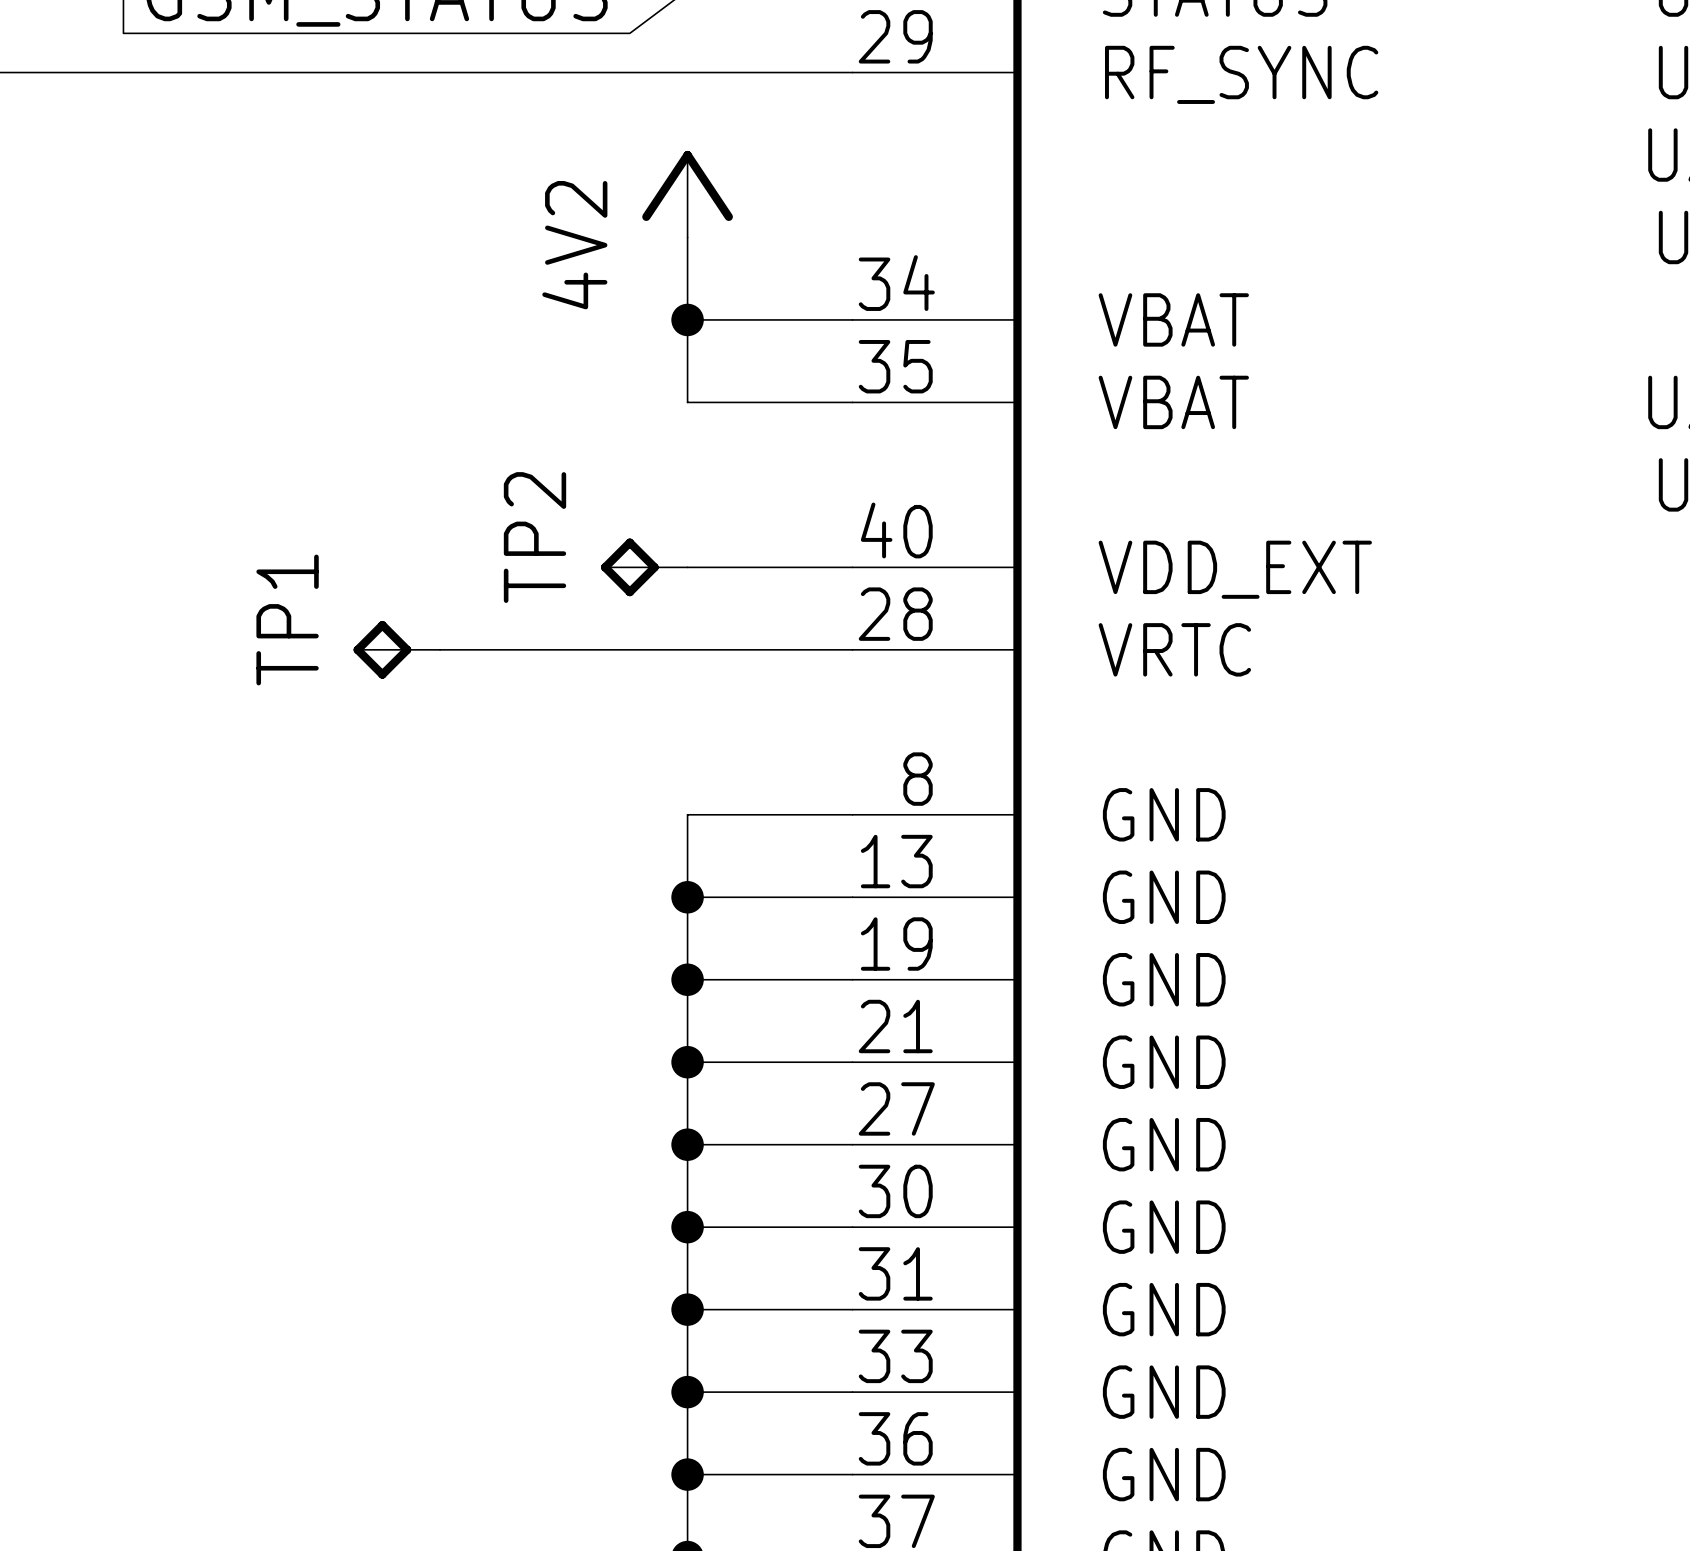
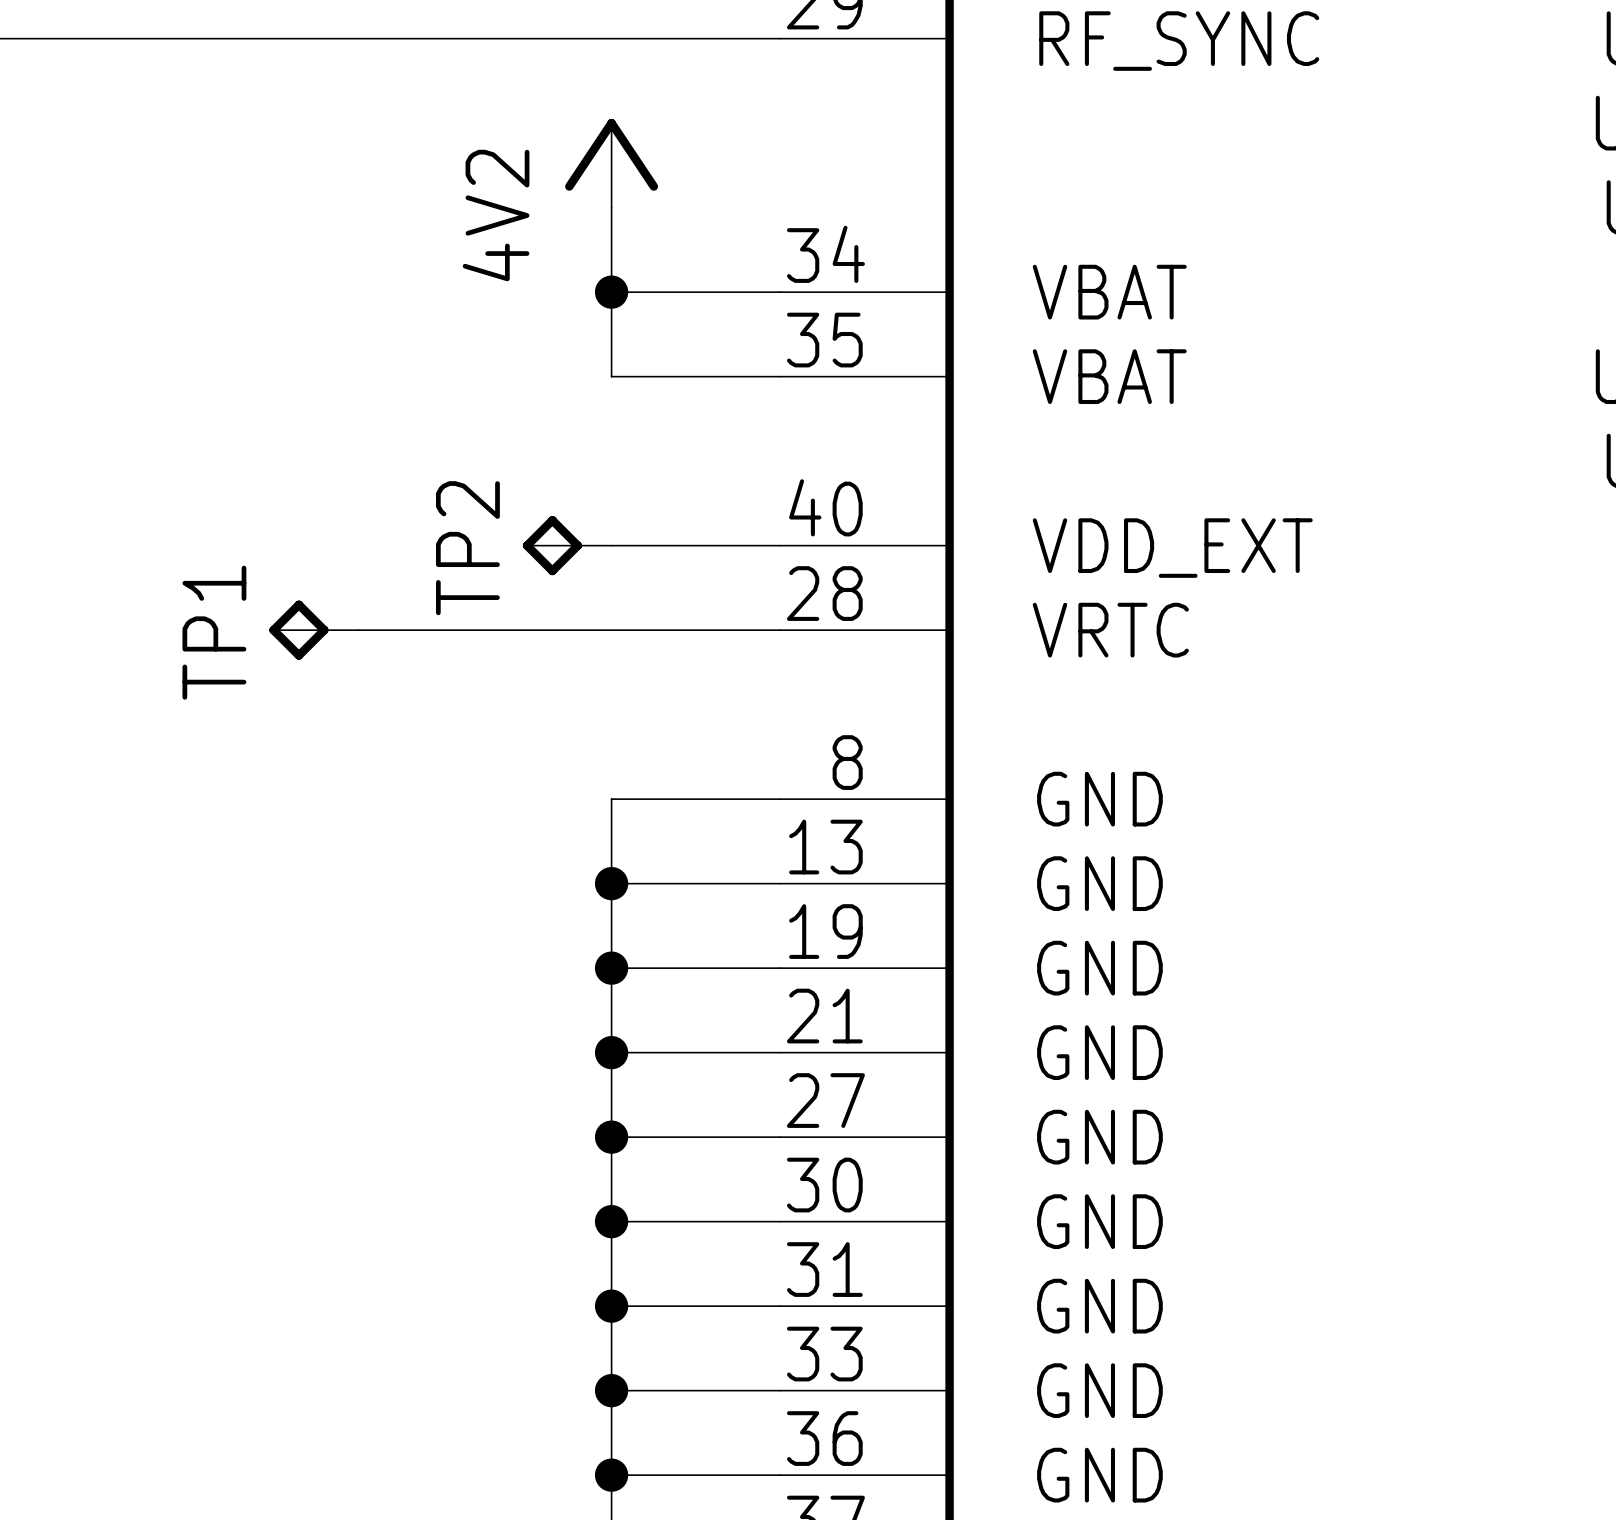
TP2 name position: TP2 (535, 537) -> TP2 (467, 548)
TP1 name position: TP1 (287, 620) -> TP1 (214, 632)

